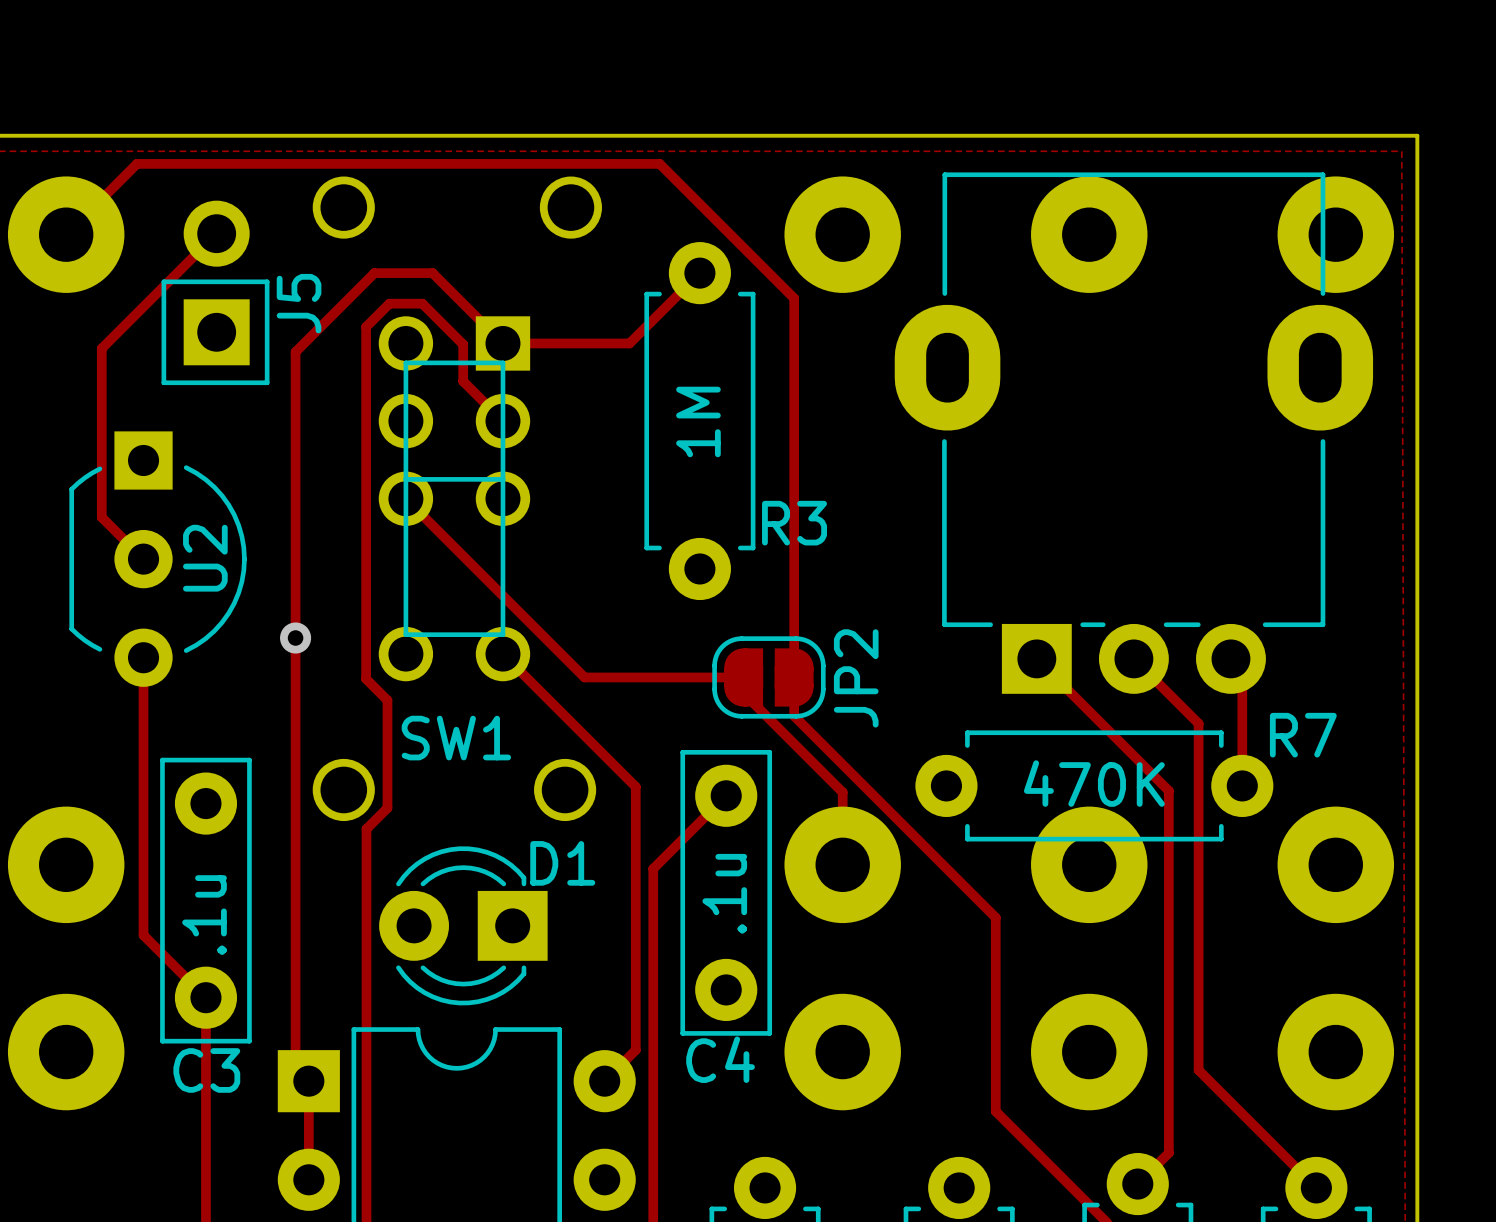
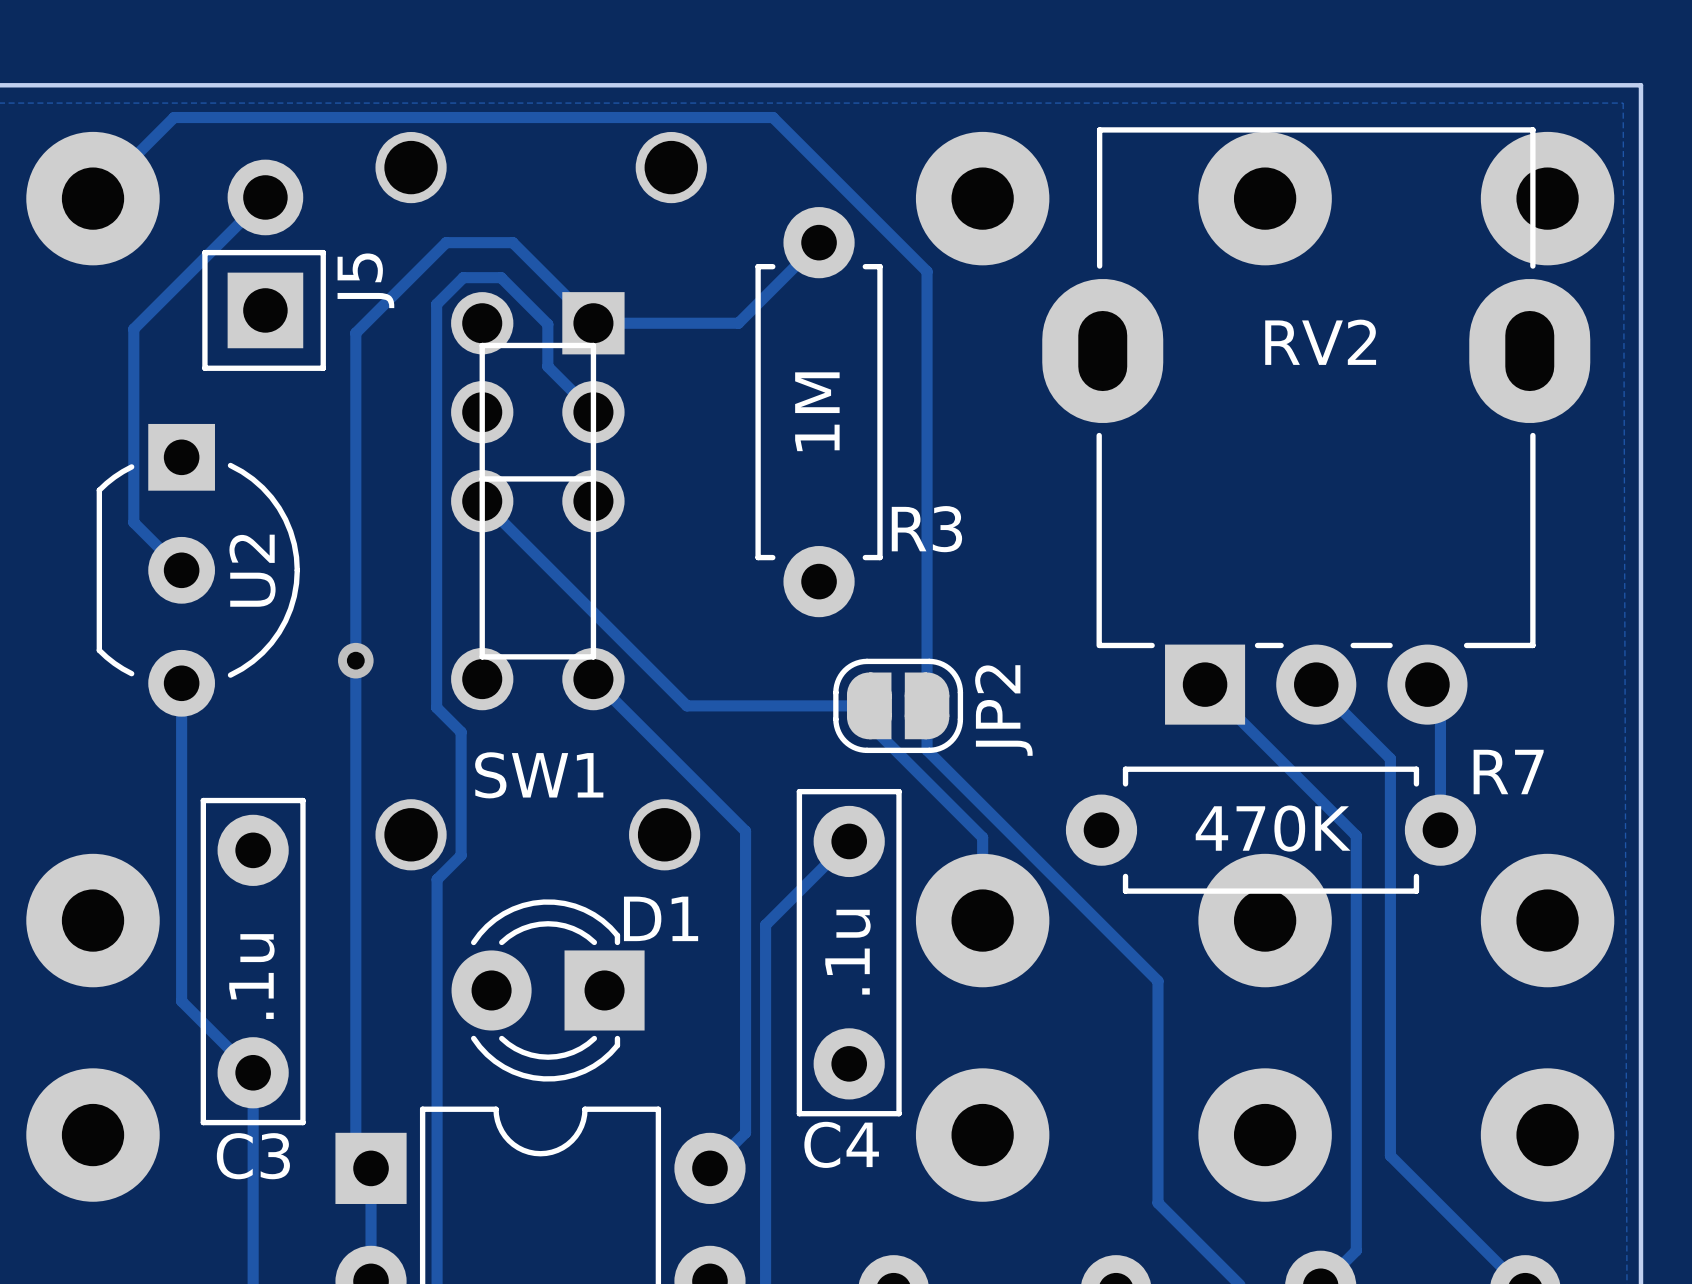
RV2 name: none -> RV2 (1320, 342)

